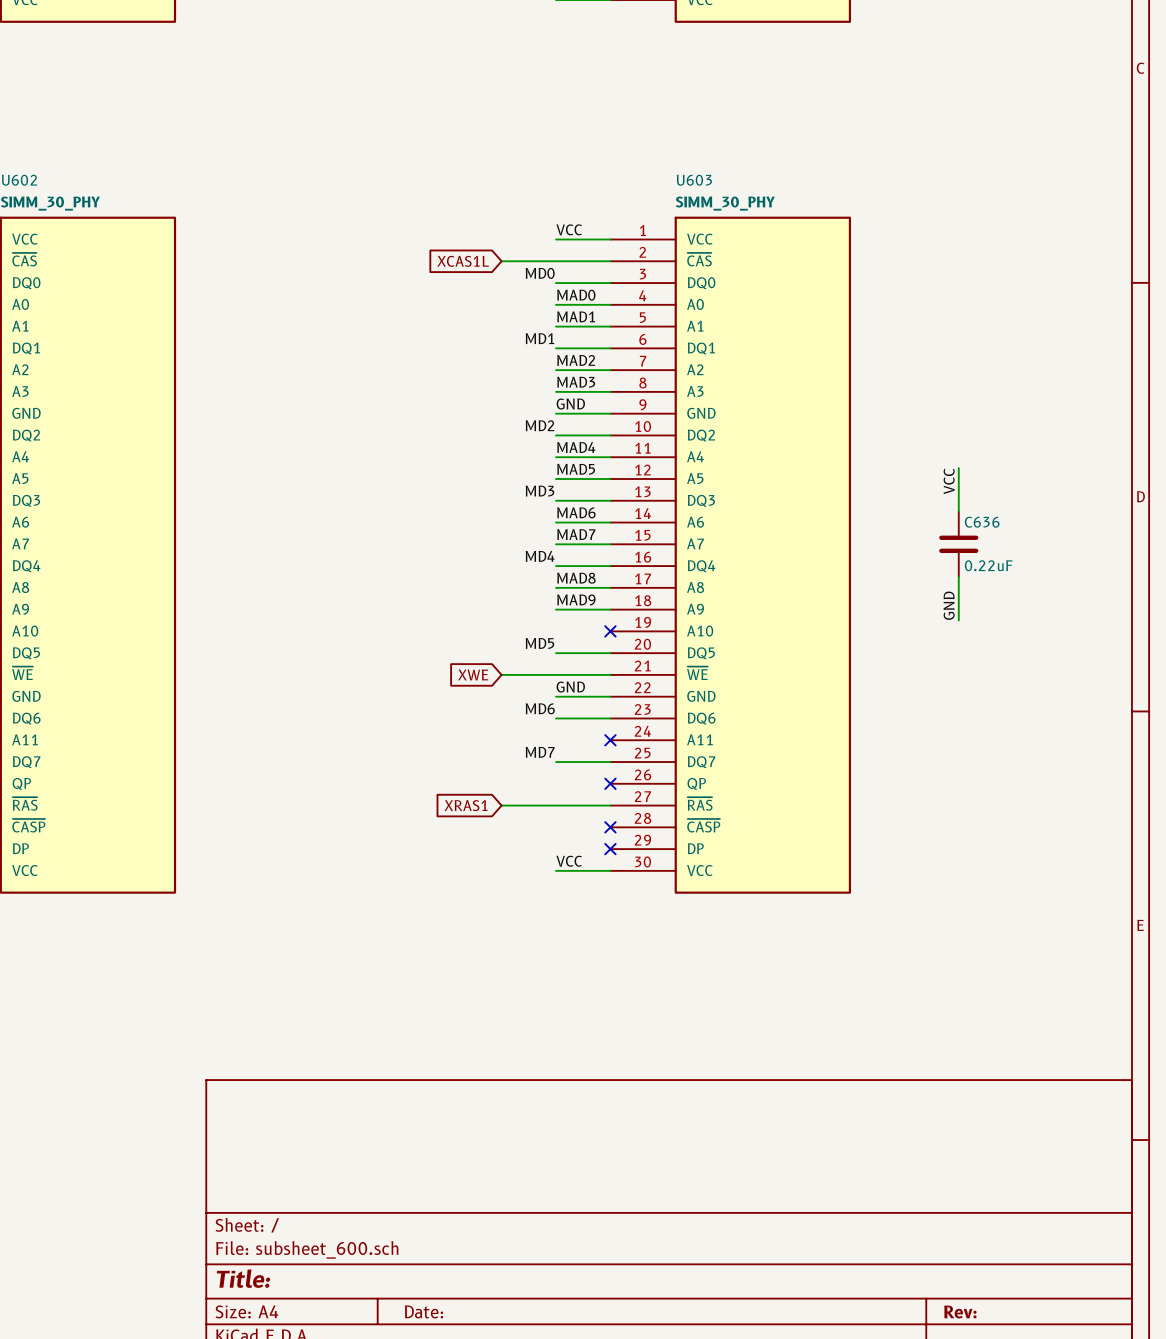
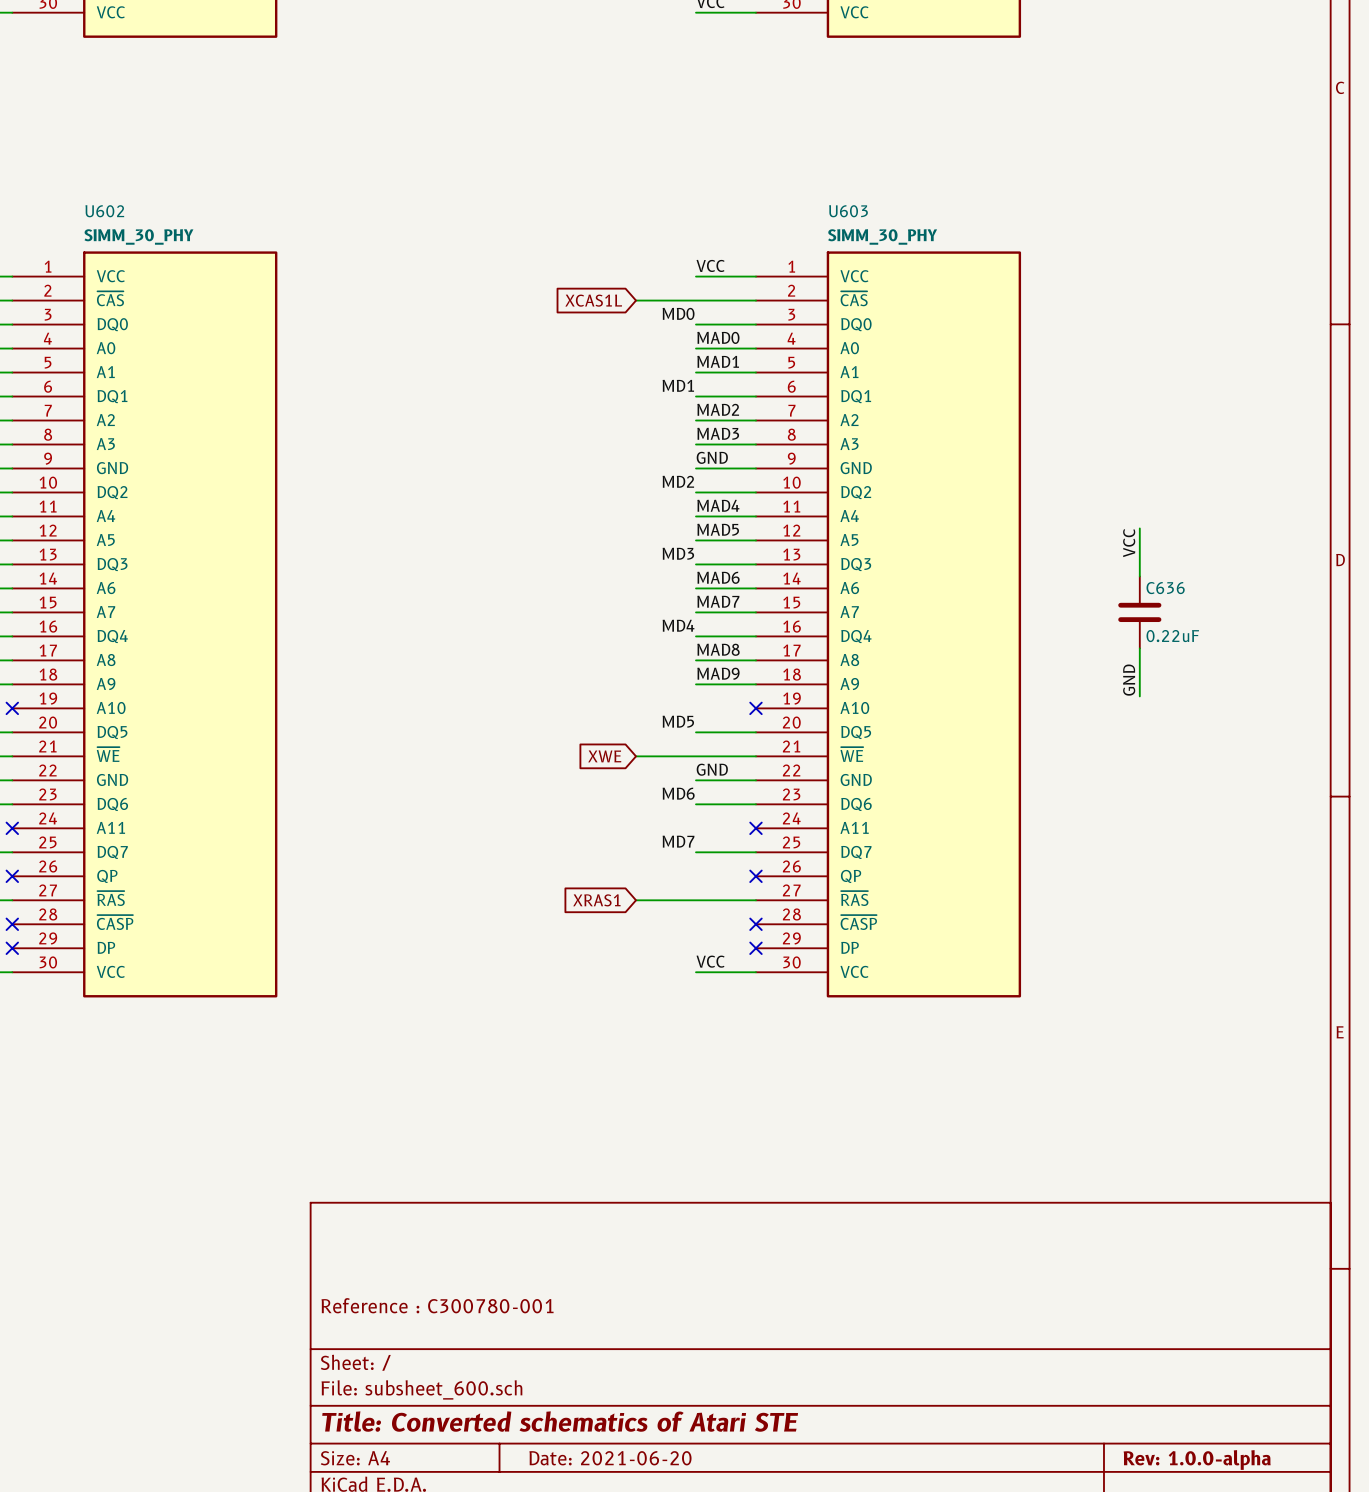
title block: none -> Reference : C300780-001 (437, 1305)
title block: Title: (243, 1278) -> Title: Converted schematics of Atari STE (560, 1421)
title block: Date: (424, 1311) -> Date: 2021-06-20 (610, 1458)
title block: Rev: (960, 1312) -> Rev: 1.0.0-alpha (1197, 1460)

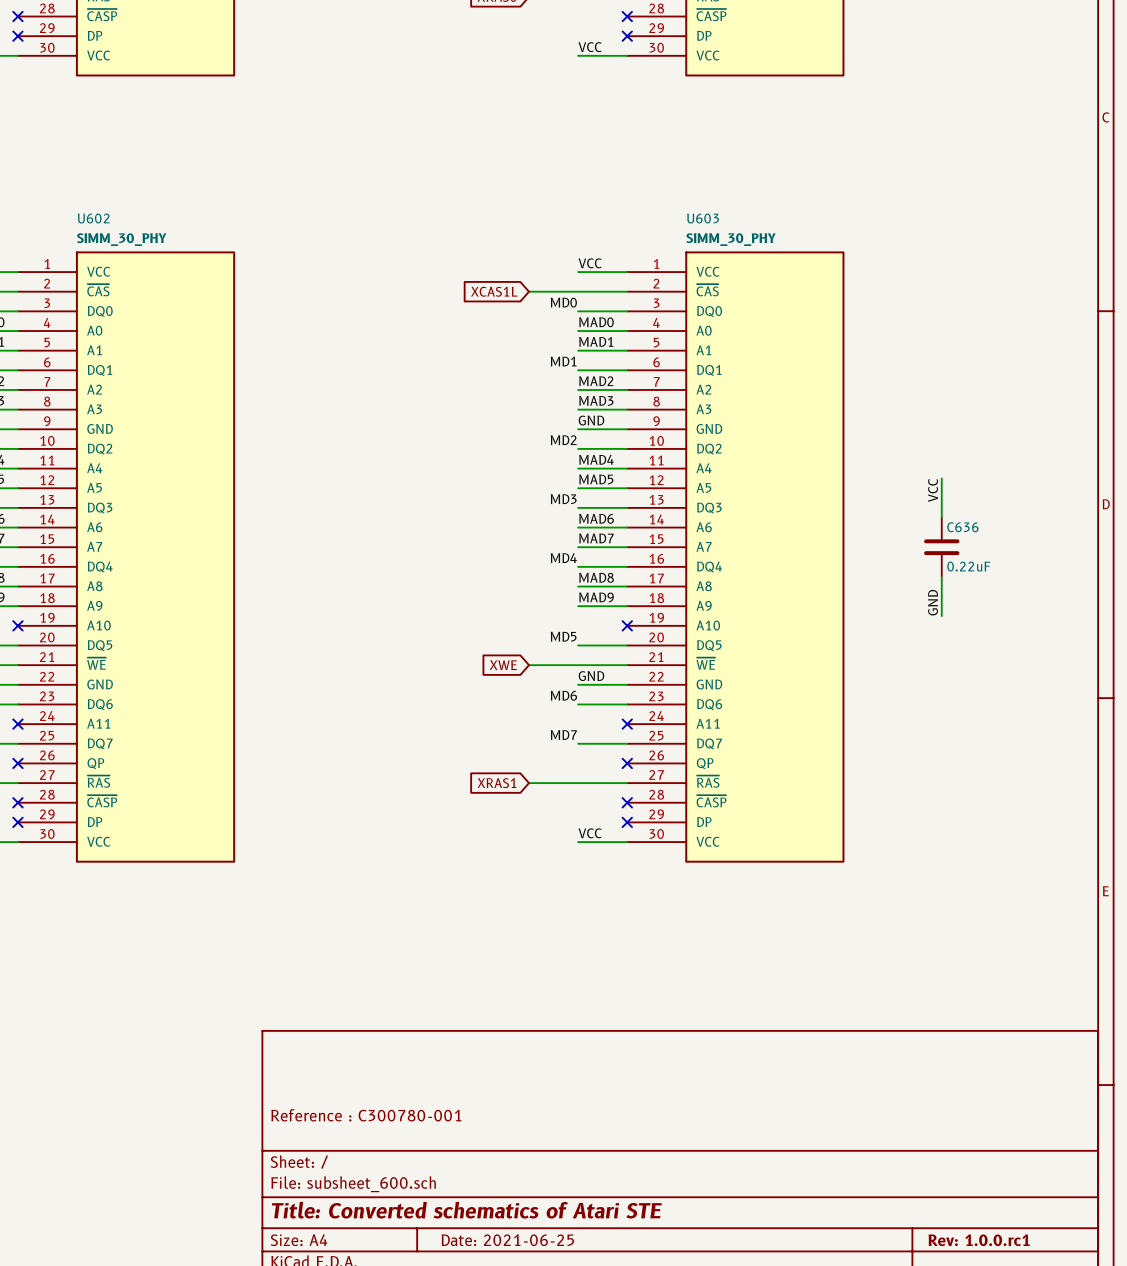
title block: Date: 2021-06-20 (610, 1458) -> Date: 2021-06-25 (507, 1240)
title block: Rev: 1.0.0-alpha (1197, 1460) -> Rev: 1.0.0.rc1 (979, 1240)

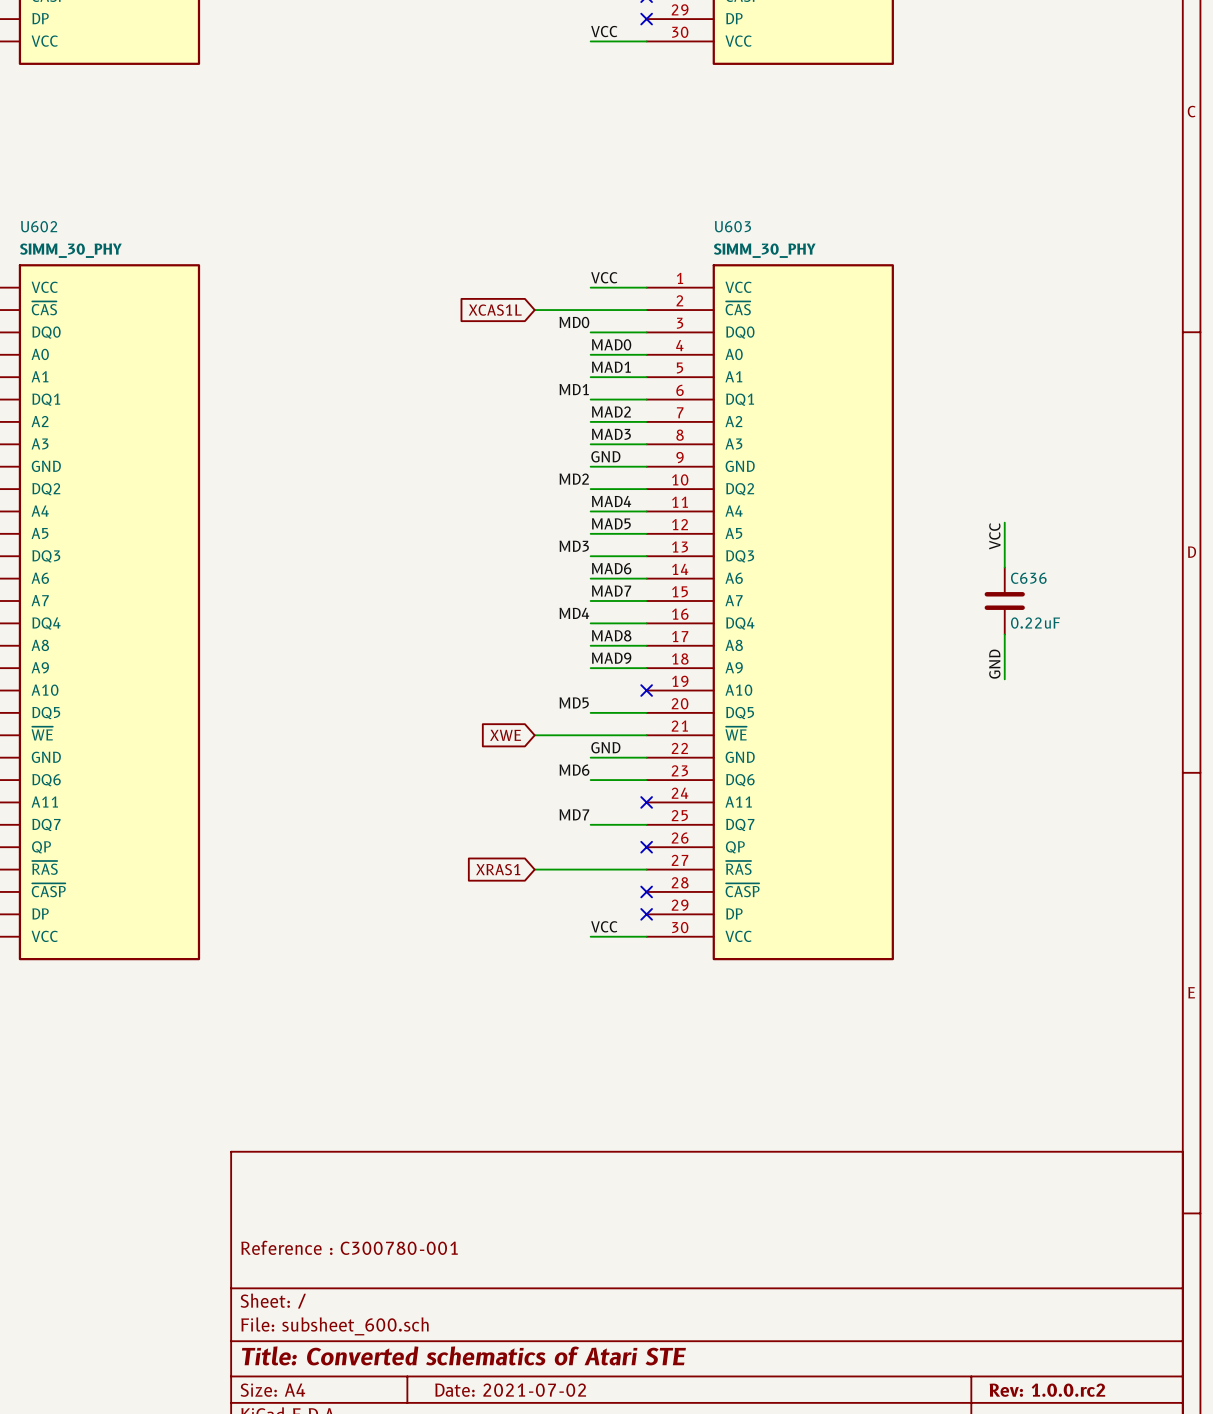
title block: Date: 2021-06-25 (507, 1240) -> Date: 2021-07-02 (510, 1390)
title block: Rev: 1.0.0.rc1 (979, 1240) -> Rev: 1.0.0.rc2 (1047, 1390)

